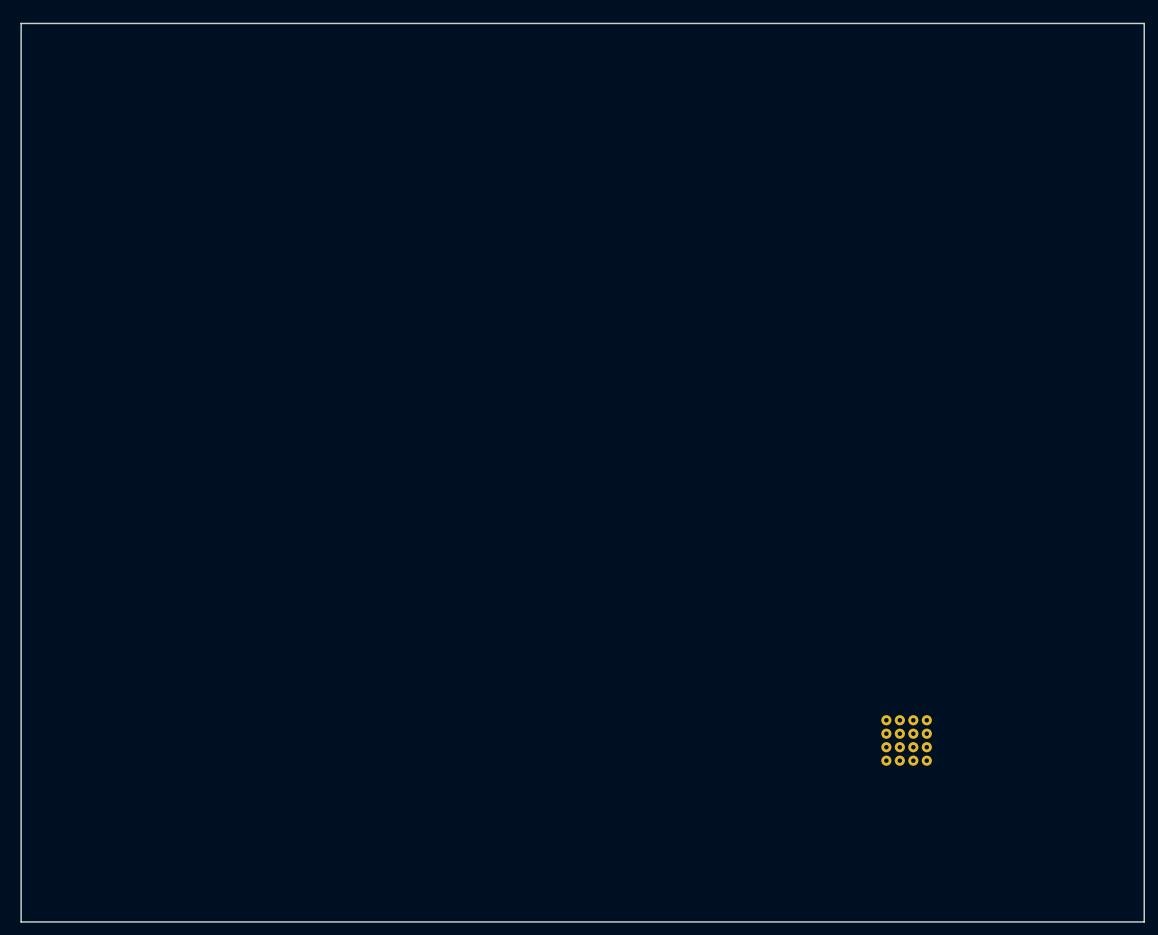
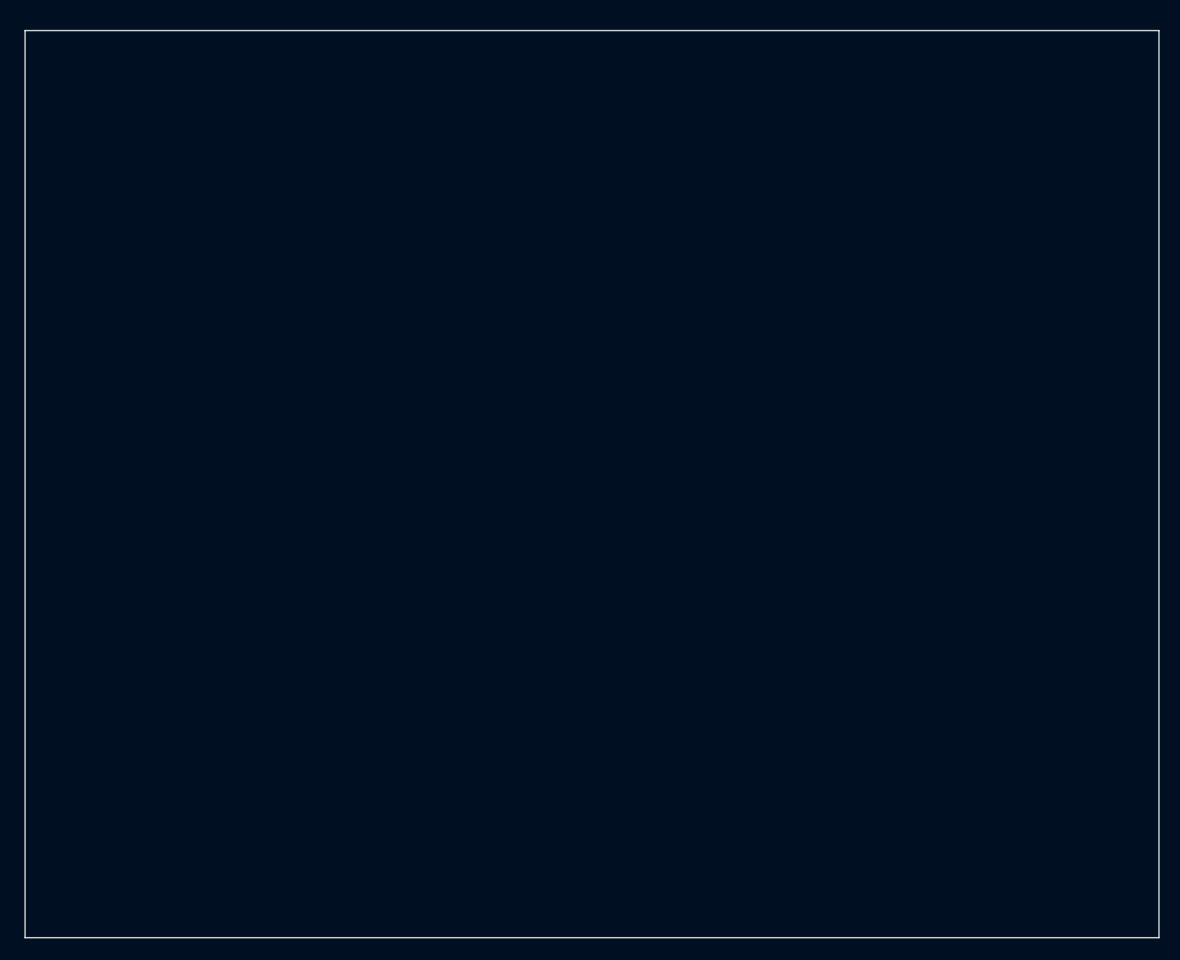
part: (906, 740) -> none

